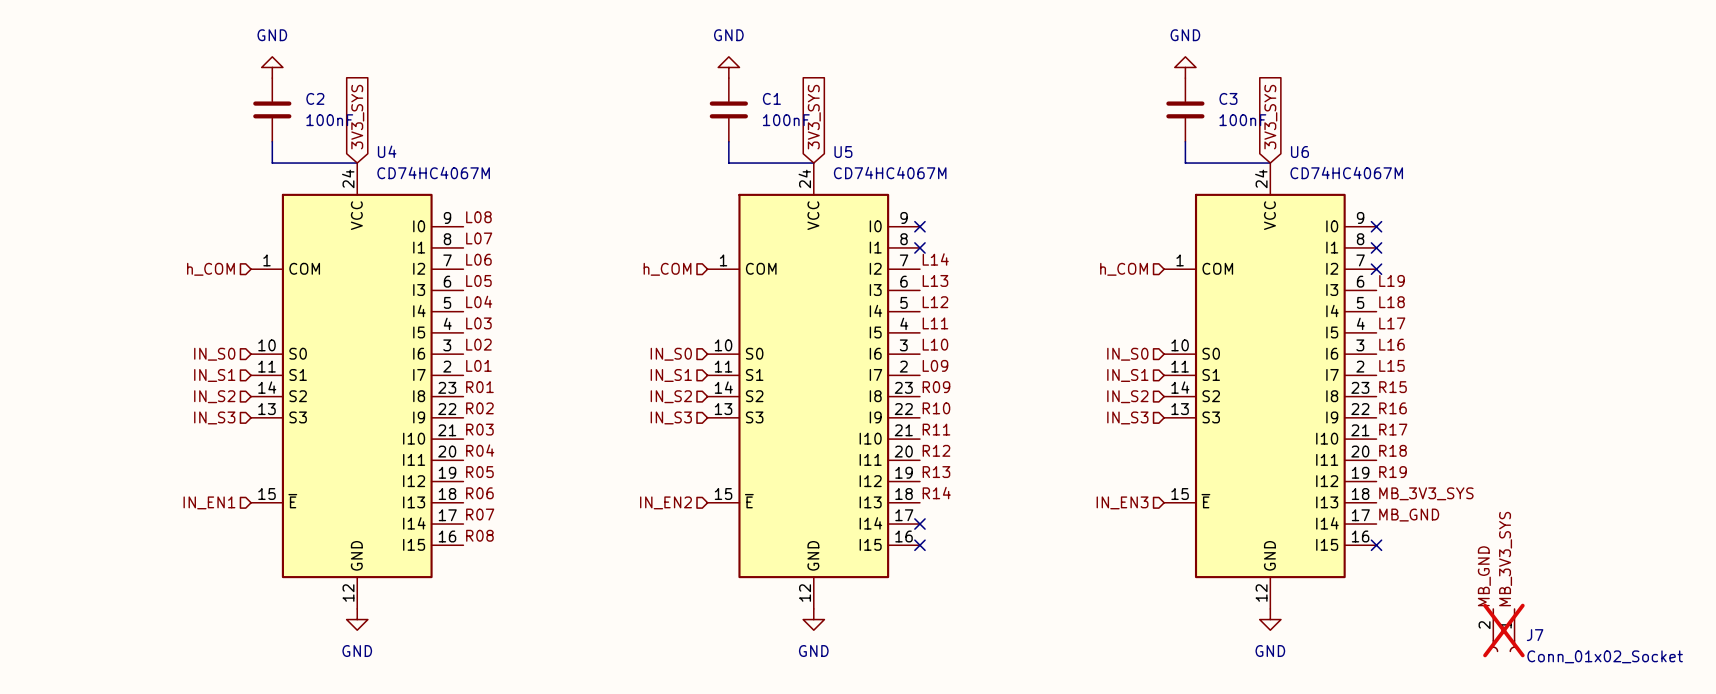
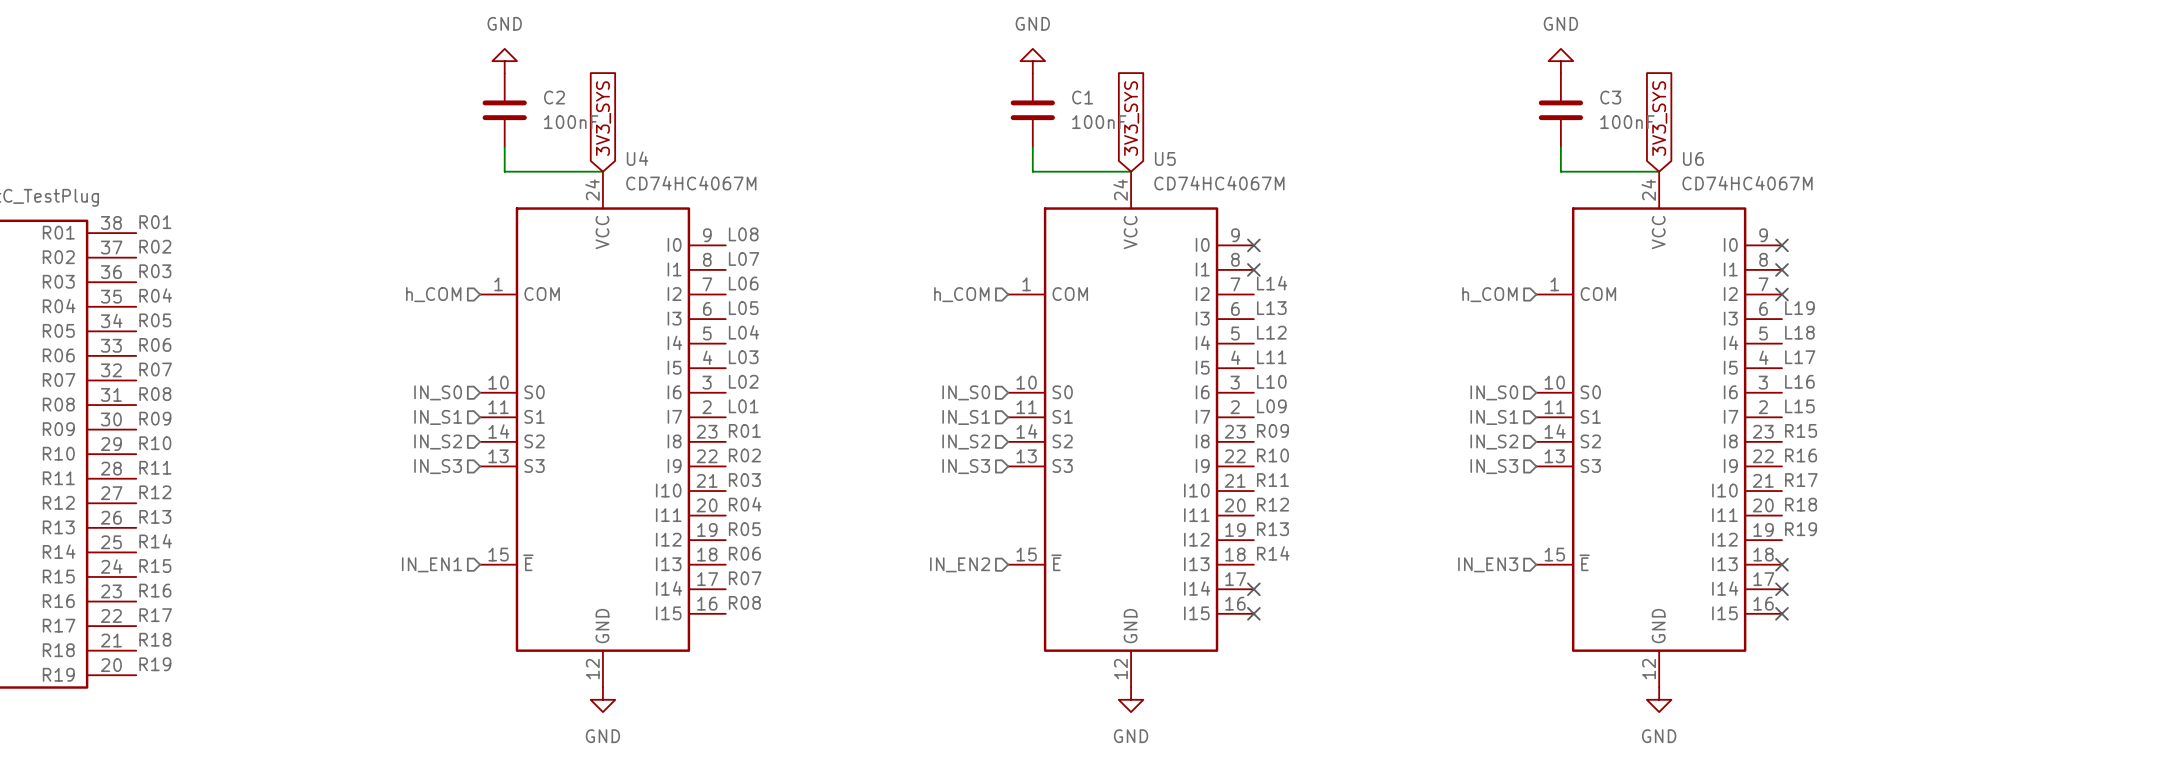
label: MB_3V3_SYS (1426, 493) -> none
no-connect mark: none -> (1781, 564)
label: MB_GND (1409, 515) -> none
no-connect mark: none -> (1781, 589)
label: MB_3V3_SYS (1505, 559) -> none
label: MB_GND (1484, 576) -> none
J7: Conn_01x02_Socket (1503, 630) -> none

